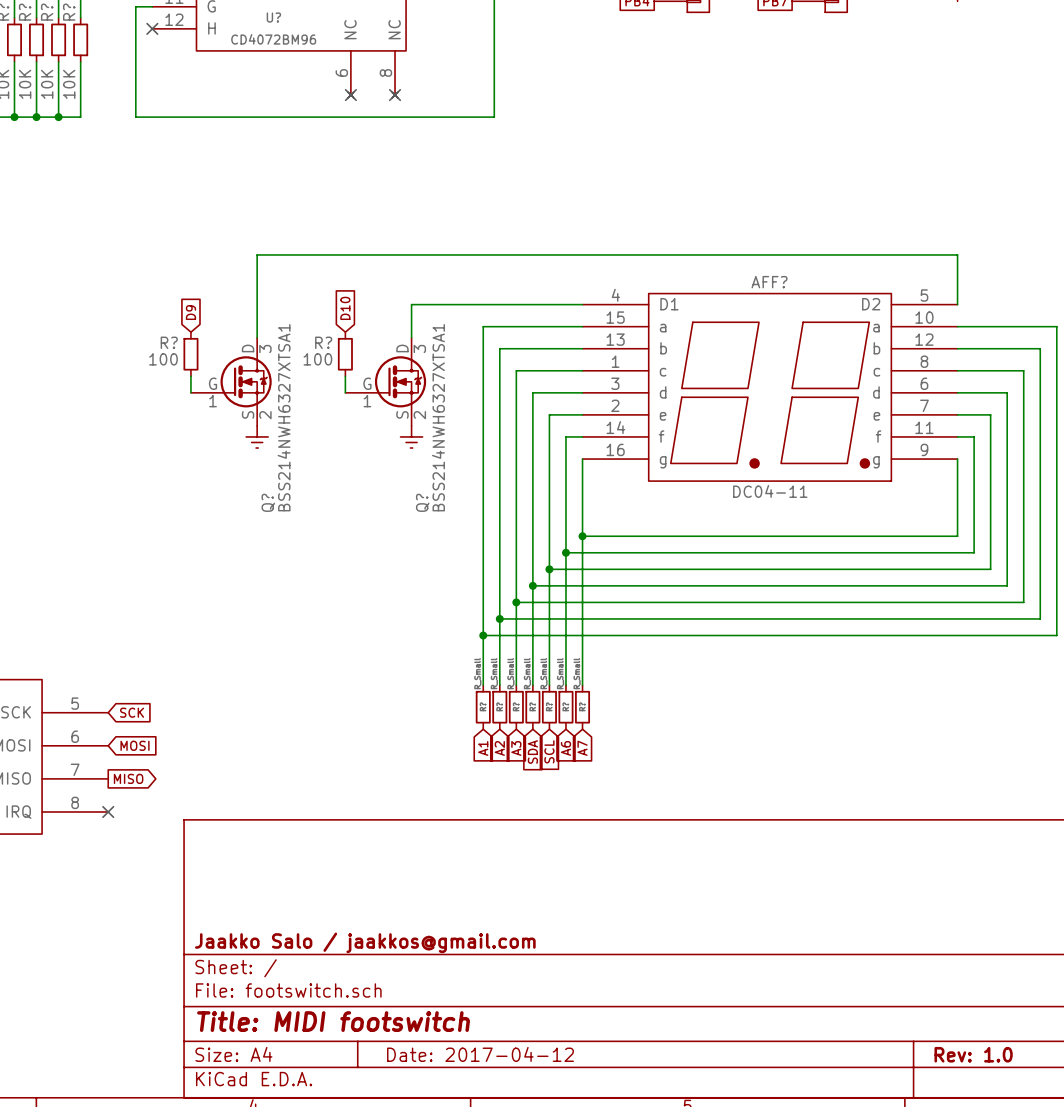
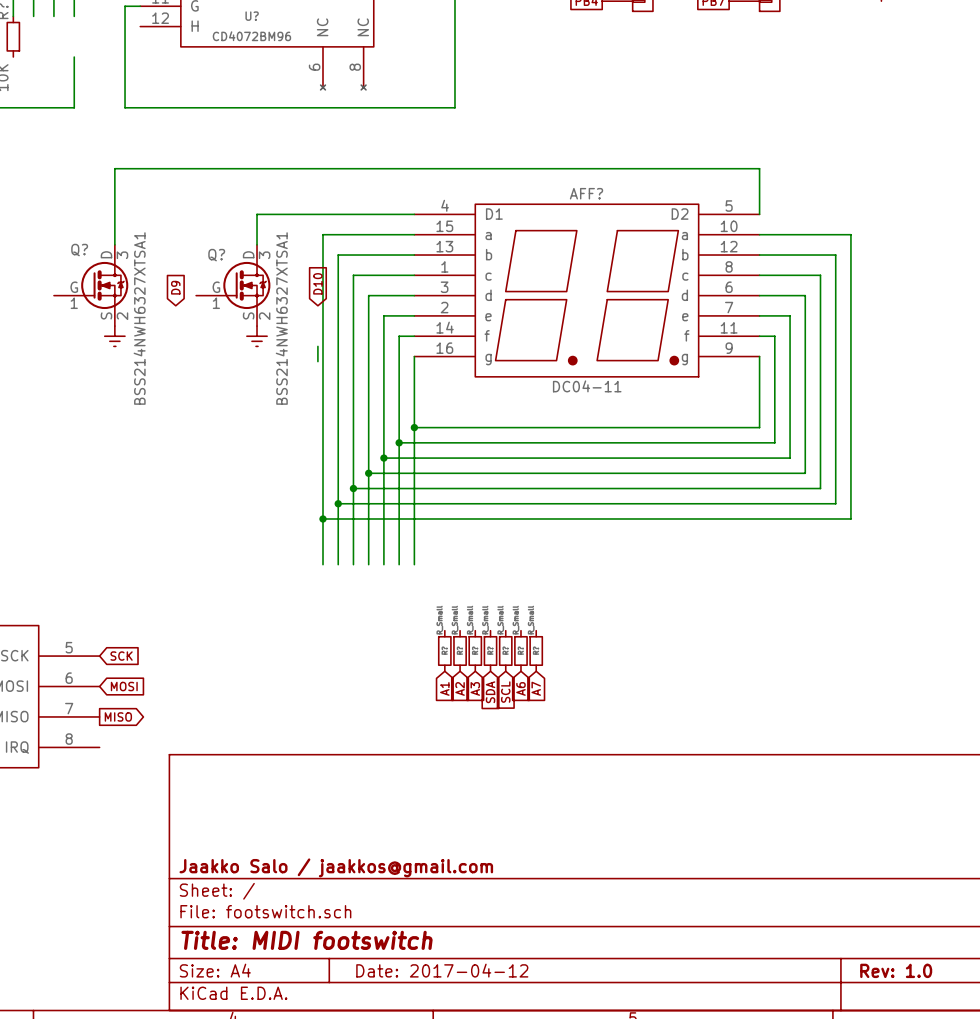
no-connect mark: (152, 28) -> none
R?: 10K (36, 39) -> none
R?: 10K (58, 39) -> none
R?: 10K (80, 39) -> none
wire: (14, 61) (14, 117) -> none
wire: (36, 61) (36, 117) -> none
wire: (58, 61) (58, 117) -> none
no-connect mark: (350, 95) -> none
no-connect mark: (395, 95) -> none
junction: (14, 117) -> none
junction: (36, 117) -> none
junction: (58, 117) -> none
wire: none -> (759, 214) (759, 168) (114, 168) (114, 244)
wire: (350, 254) (257, 254) (257, 337) -> (323, 234) (323, 564)
wire: (450, 254) (825, 254) -> none
wire: (924, 254) (957, 254) (957, 304) -> (850, 234) (850, 518) (323, 518)
wire: (582, 304) (411, 304) (411, 337) -> (414, 214) (257, 214) (257, 244)
Q?: none -> BSS214NWH6327XTSA1 (91, 285)
wire: (582, 326) (483, 326) (483, 685) -> none
wire: (957, 326) (1056, 326) (1056, 635) (483, 635) -> none
wire: (582, 348) (499, 348) (499, 685) -> (414, 255) (338, 255) (338, 564)
wire: (957, 348) (1040, 348) (1040, 618) (499, 618) -> (759, 255) (835, 255) (835, 503) (338, 503)
R?: 100 (190, 354) -> none
R?: 100 (345, 354) -> none
power symbol: none -> (114, 336)
wire: (582, 370) (516, 370) (516, 685) -> (414, 275) (353, 275) (353, 564)
wire: (957, 370) (1023, 370) (1023, 602) (516, 602) -> (759, 275) (820, 275) (820, 488) (353, 488)
wire: (190, 376) (190, 392) -> none
Q? position: (231, 381) -> (233, 285)
Q?: BSS214NWH6327XTSA1 (385, 381) -> none
AFF? position: (770, 387) -> (586, 290)
wire: (582, 392) (532, 392) (532, 685) -> (414, 295) (368, 295) (368, 564)
wire: (957, 392) (1007, 392) (1007, 585) (532, 585) -> (759, 295) (805, 295) (805, 473) (368, 473)
wire: (582, 414) (549, 414) (549, 685) -> (414, 315) (383, 315) (383, 564)
wire: (957, 414) (990, 414) (990, 569) (549, 569) -> (759, 315) (790, 315) (790, 458) (383, 458)
power symbol position: (257, 436) -> (257, 336)
power symbol: (411, 436) -> none
wire: (582, 436) (565, 436) (565, 685) -> (414, 336) (399, 336) (399, 564)
wire: (957, 436) (974, 436) (974, 552) (565, 552) -> (759, 336) (774, 336) (774, 442) (399, 442)
wire: (582, 459) (582, 685) -> (414, 356) (414, 564)
wire: (957, 459) (957, 536) (582, 536) -> (759, 356) (759, 427) (414, 427)
junction: none -> (414, 427)
junction: none -> (399, 442)
junction: none -> (383, 458)
Q? name rotation: 0° (268, 502) -> 90° clockwise (216, 255)
Q? name position: Q? (268, 502) -> Q? (216, 255)
junction: none -> (368, 473)
junction: none -> (353, 488)
junction: (582, 536) -> none
junction: none -> (338, 503)
junction: (565, 552) -> none
junction: none -> (323, 518)
junction: (549, 569) -> none
junction: (532, 585) -> none
junction: (516, 602) -> none
junction: (499, 618) -> none
junction: (483, 635) -> none
no-connect mark: (108, 811) -> none

